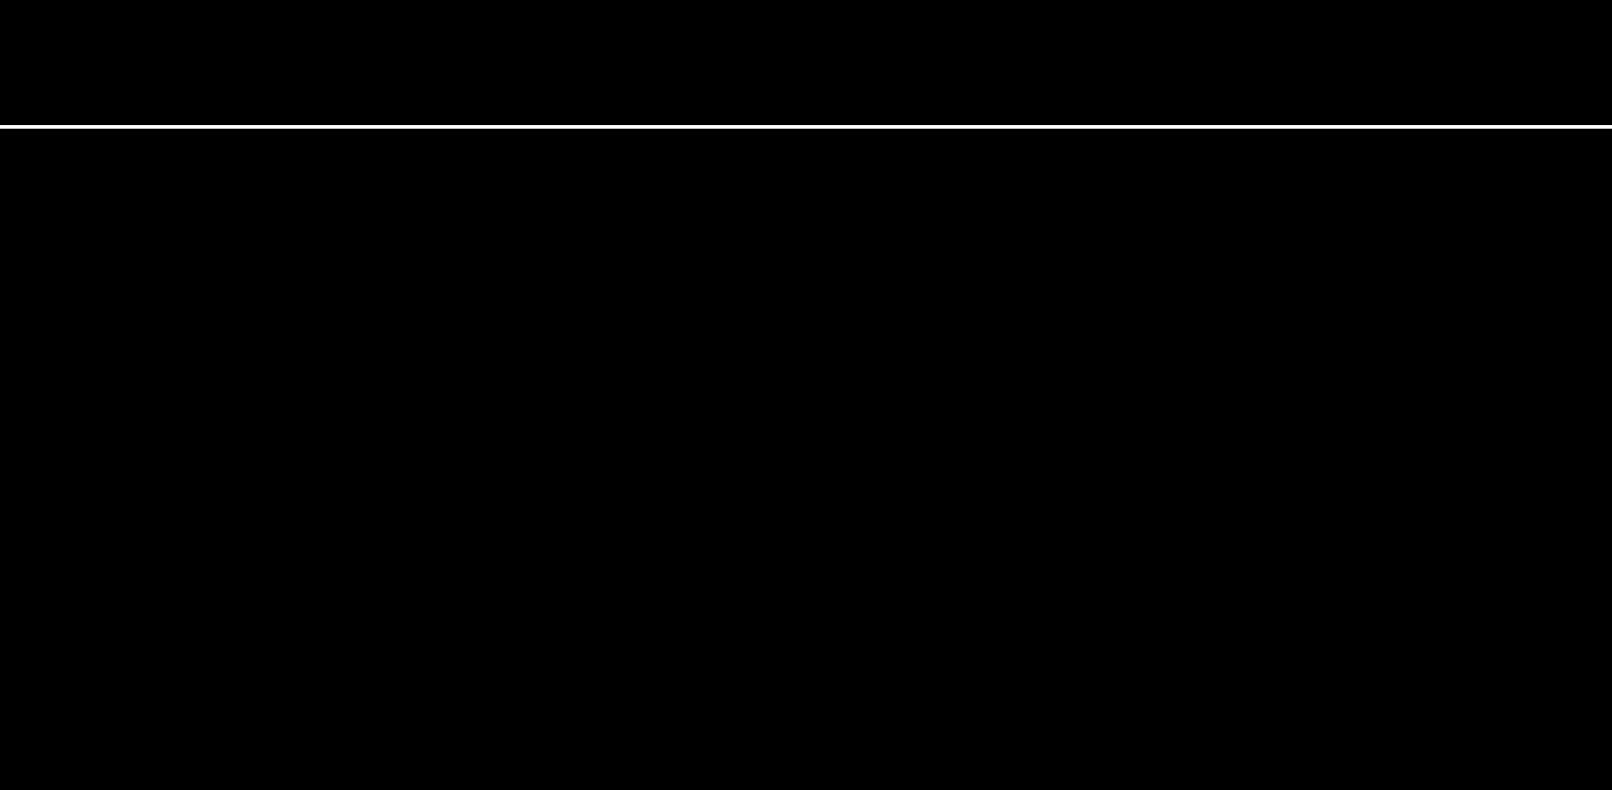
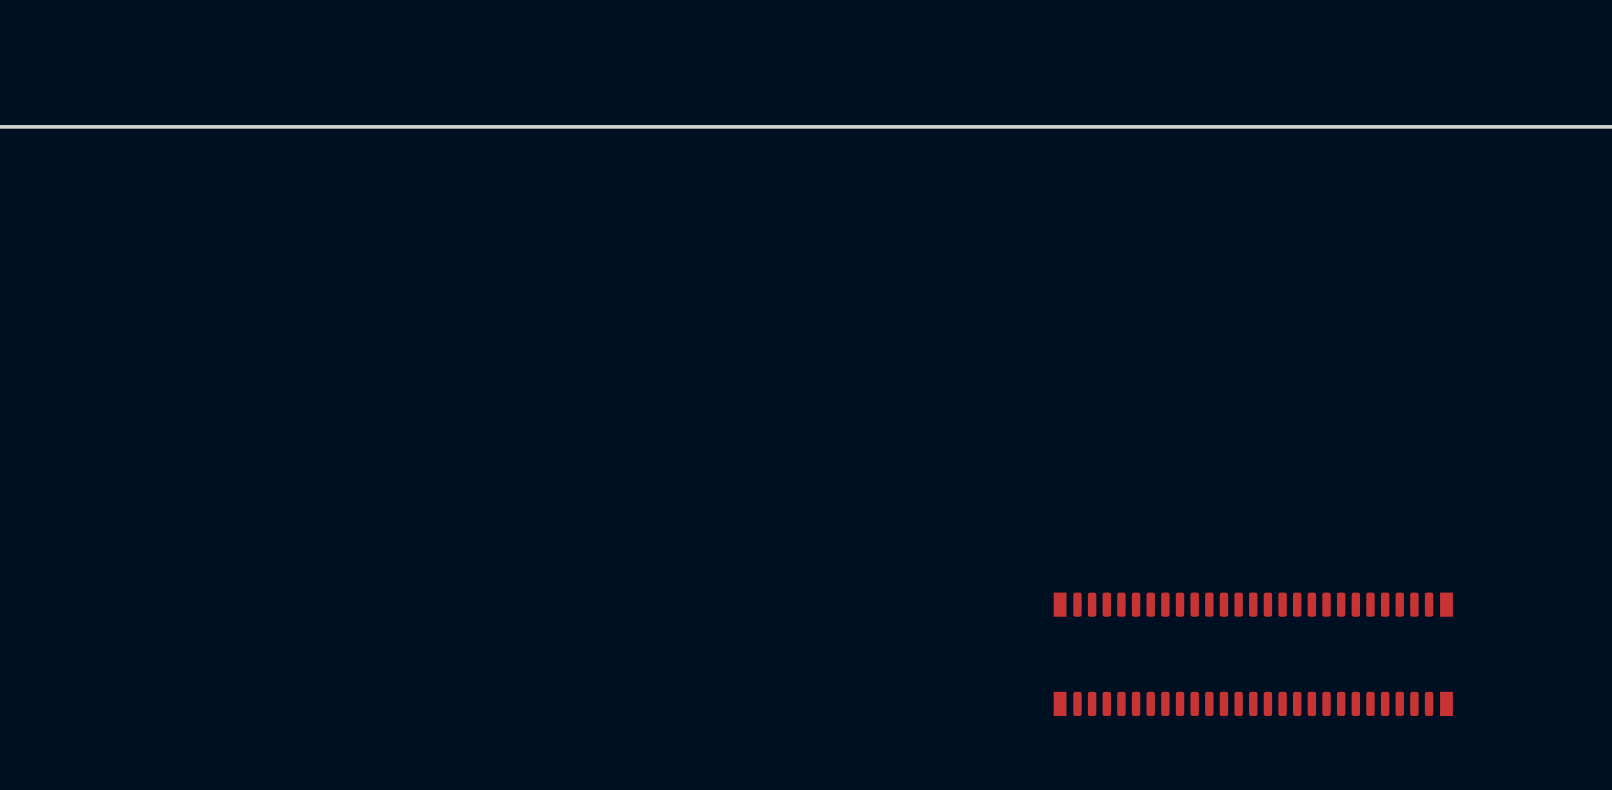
part: none -> (1253, 654)

